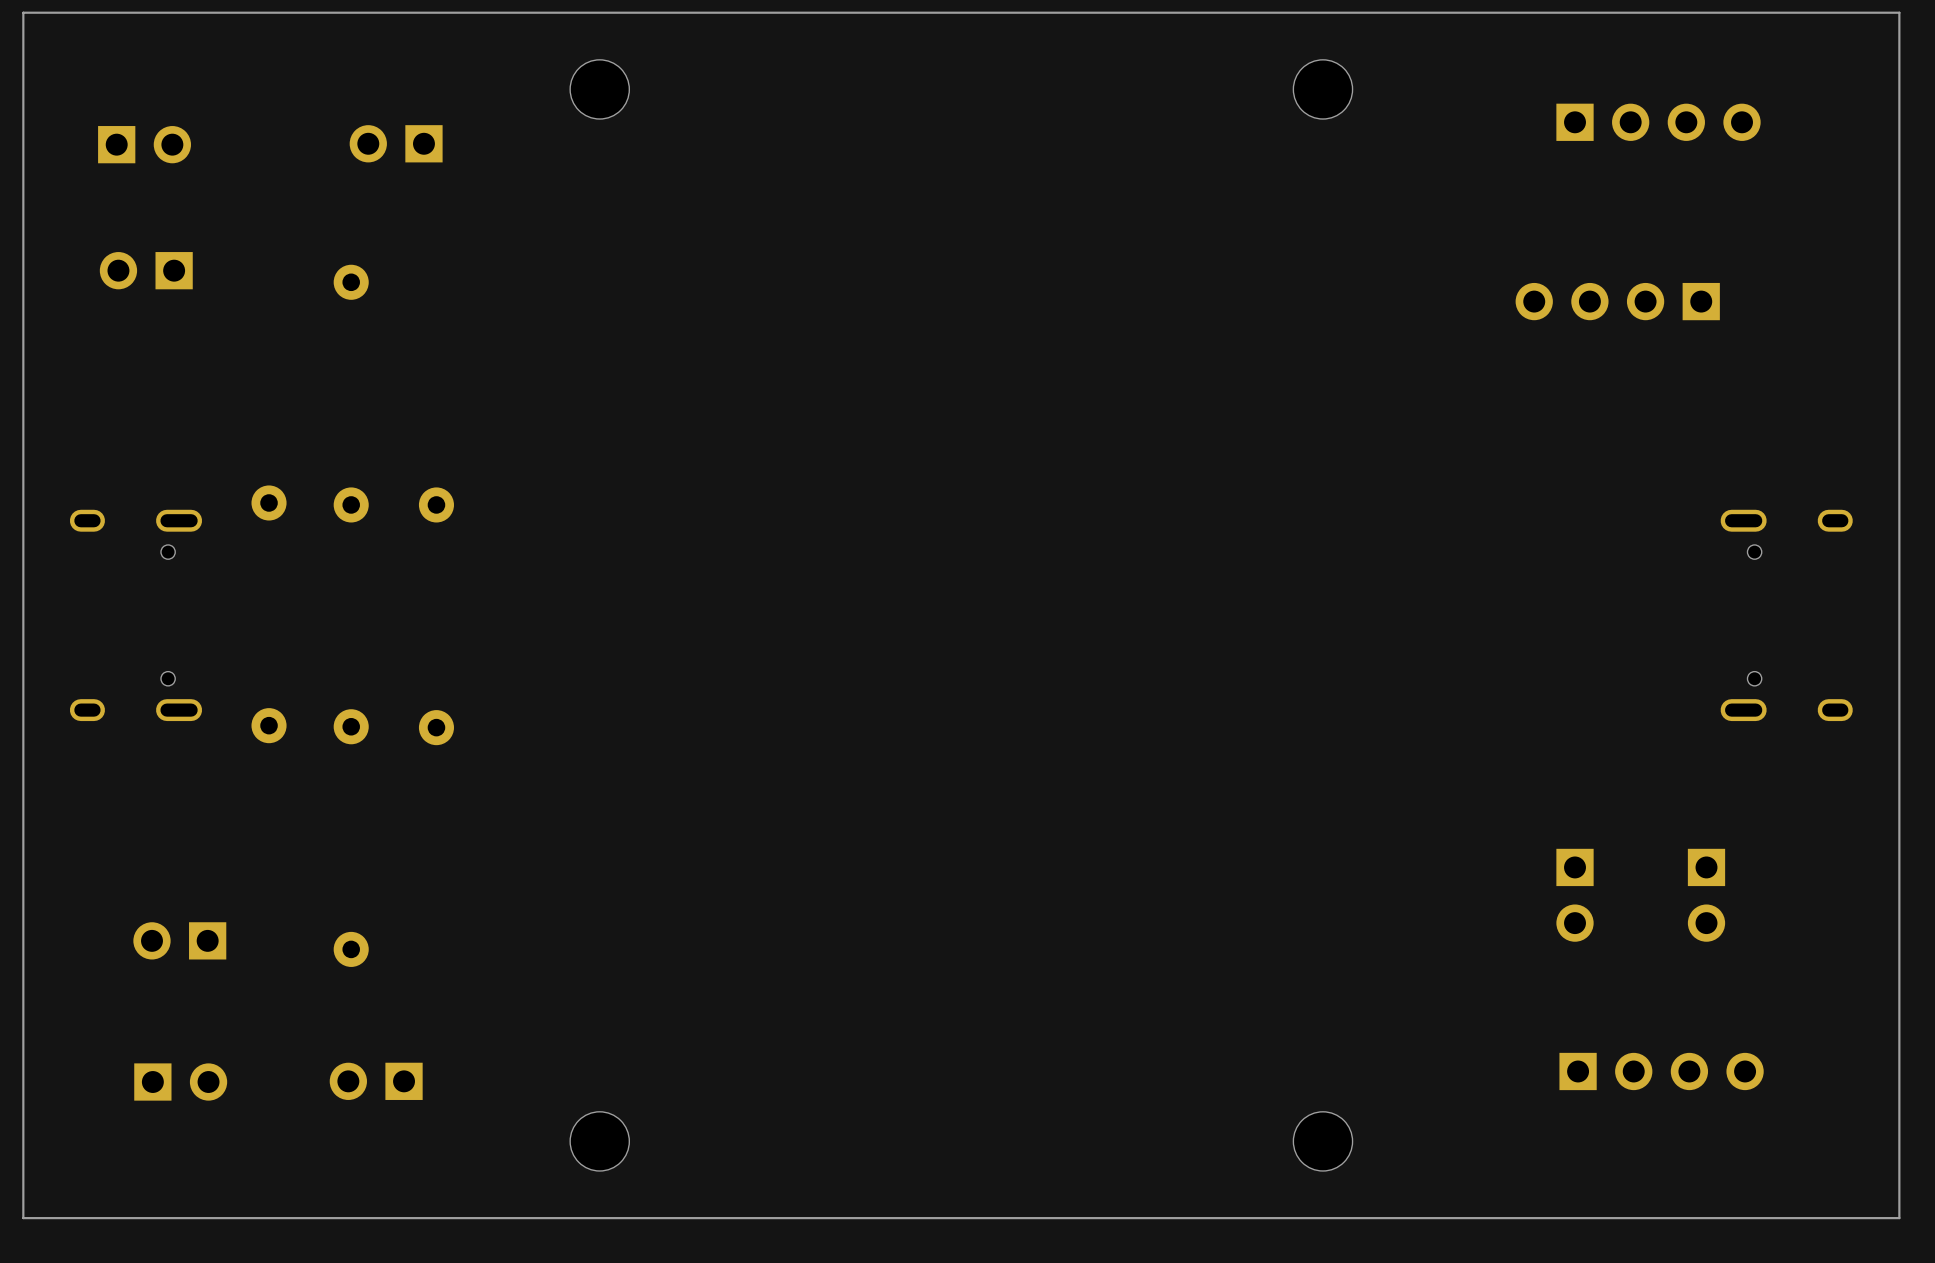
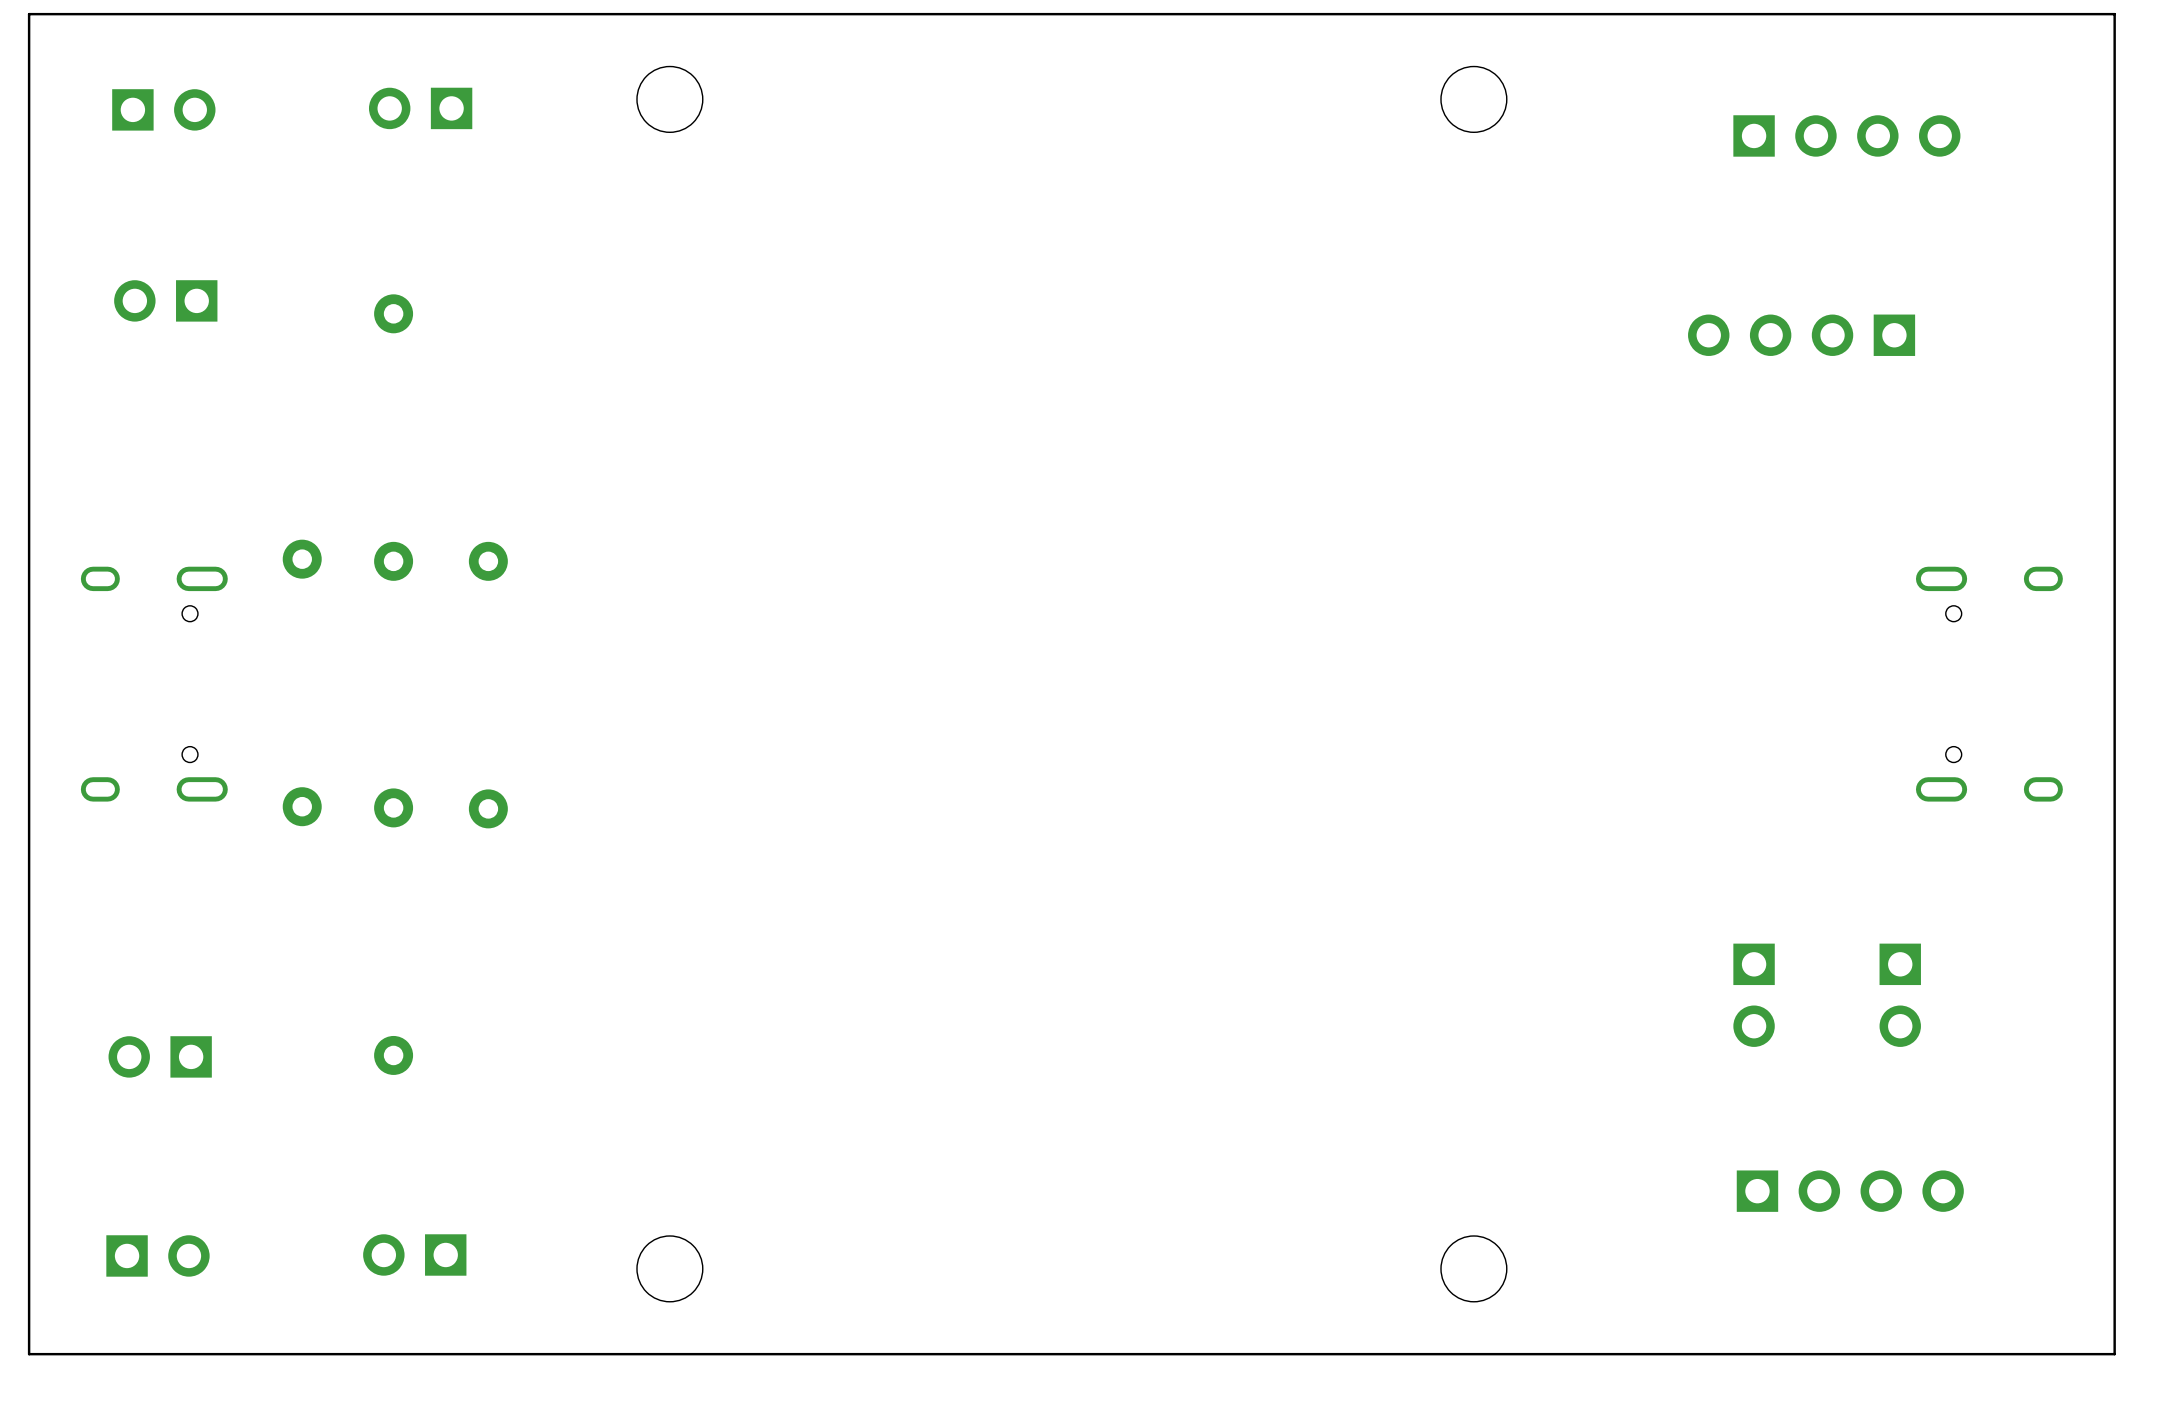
part position: (396, 143) -> (420, 108)
part position: (144, 144) -> (163, 109)
part position: (179, 940) -> (160, 1056)
part position: (376, 1081) -> (414, 1254)
part position: (180, 1082) -> (157, 1255)

